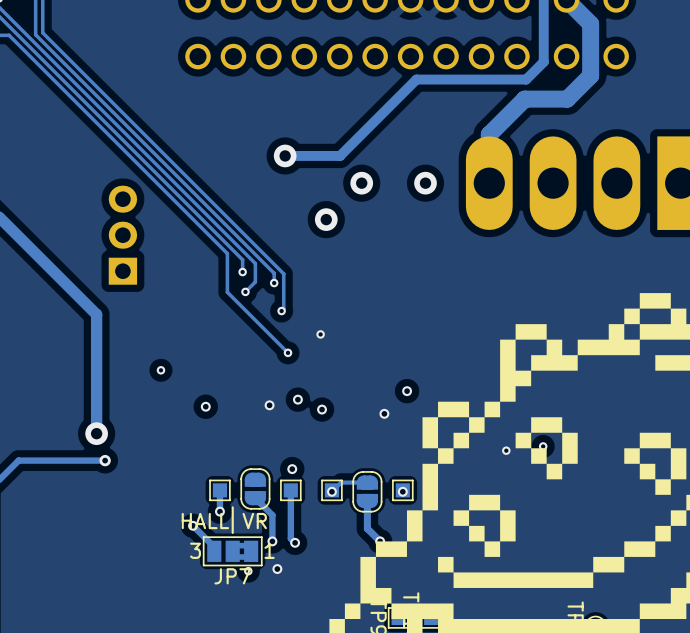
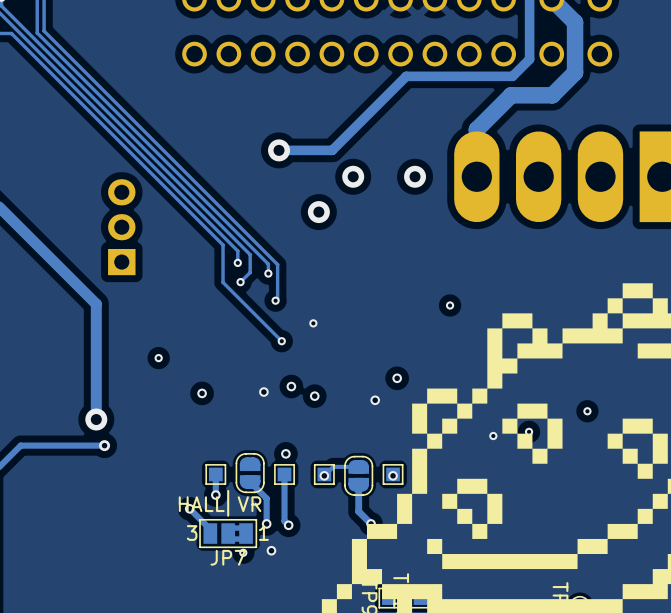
via: none -> (450, 305)
via: none -> (587, 411)

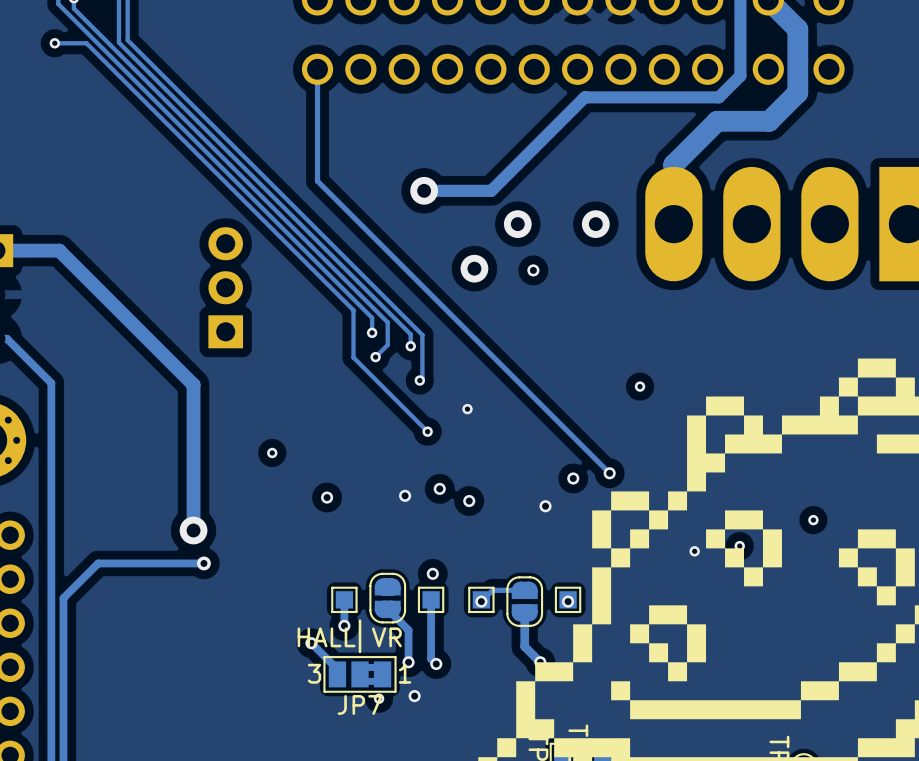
track: none -> (317, 69) (317, 181) (609, 473)
via: none -> (533, 270)
via: none -> (609, 473)

